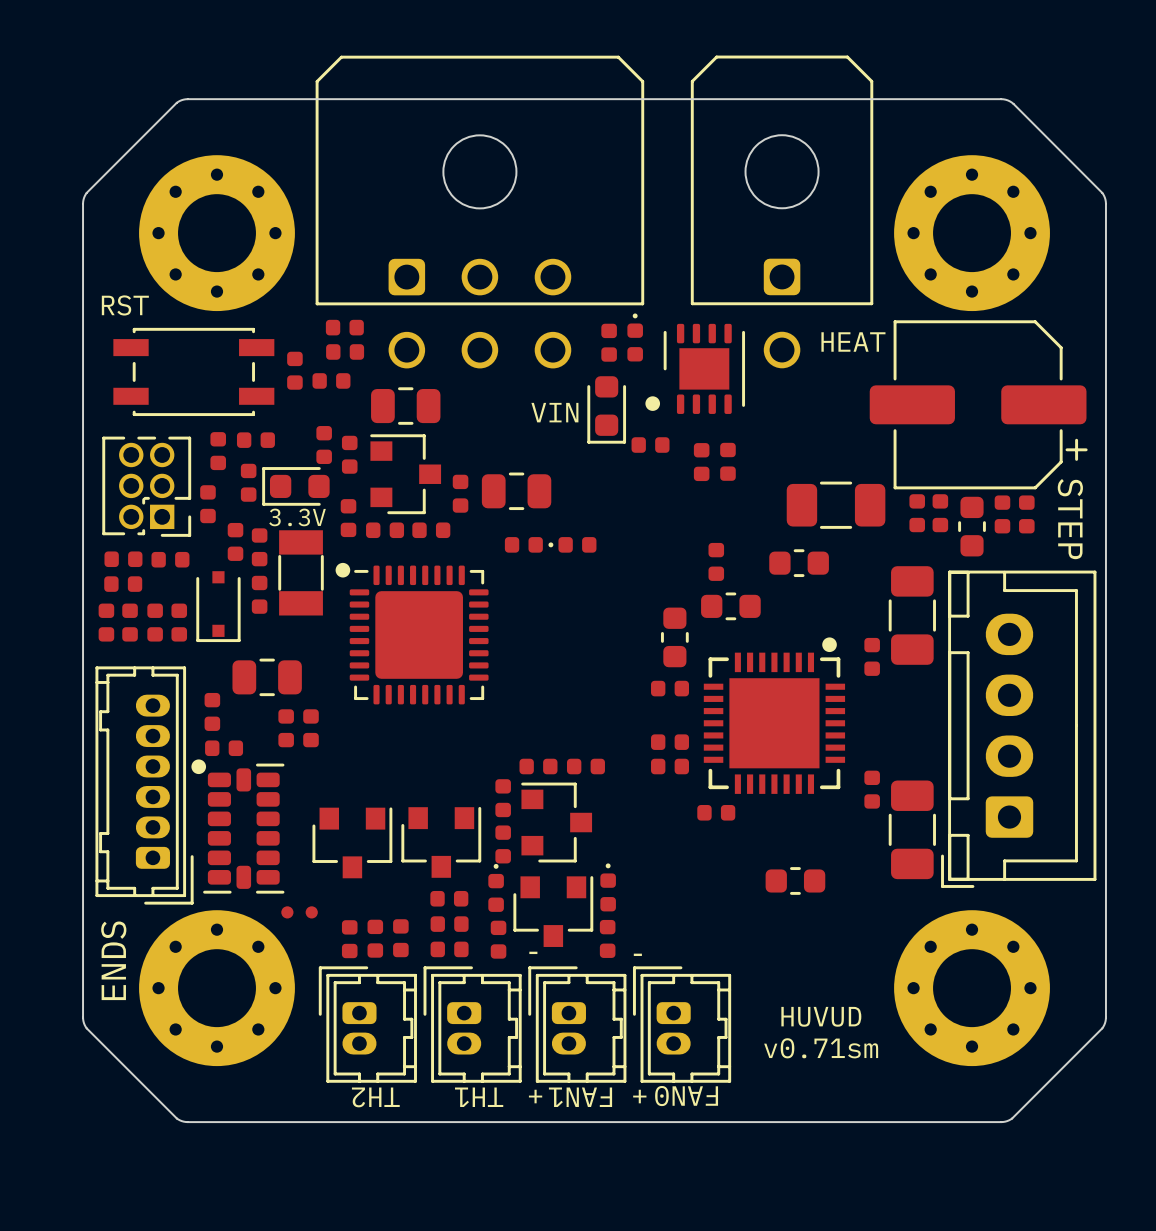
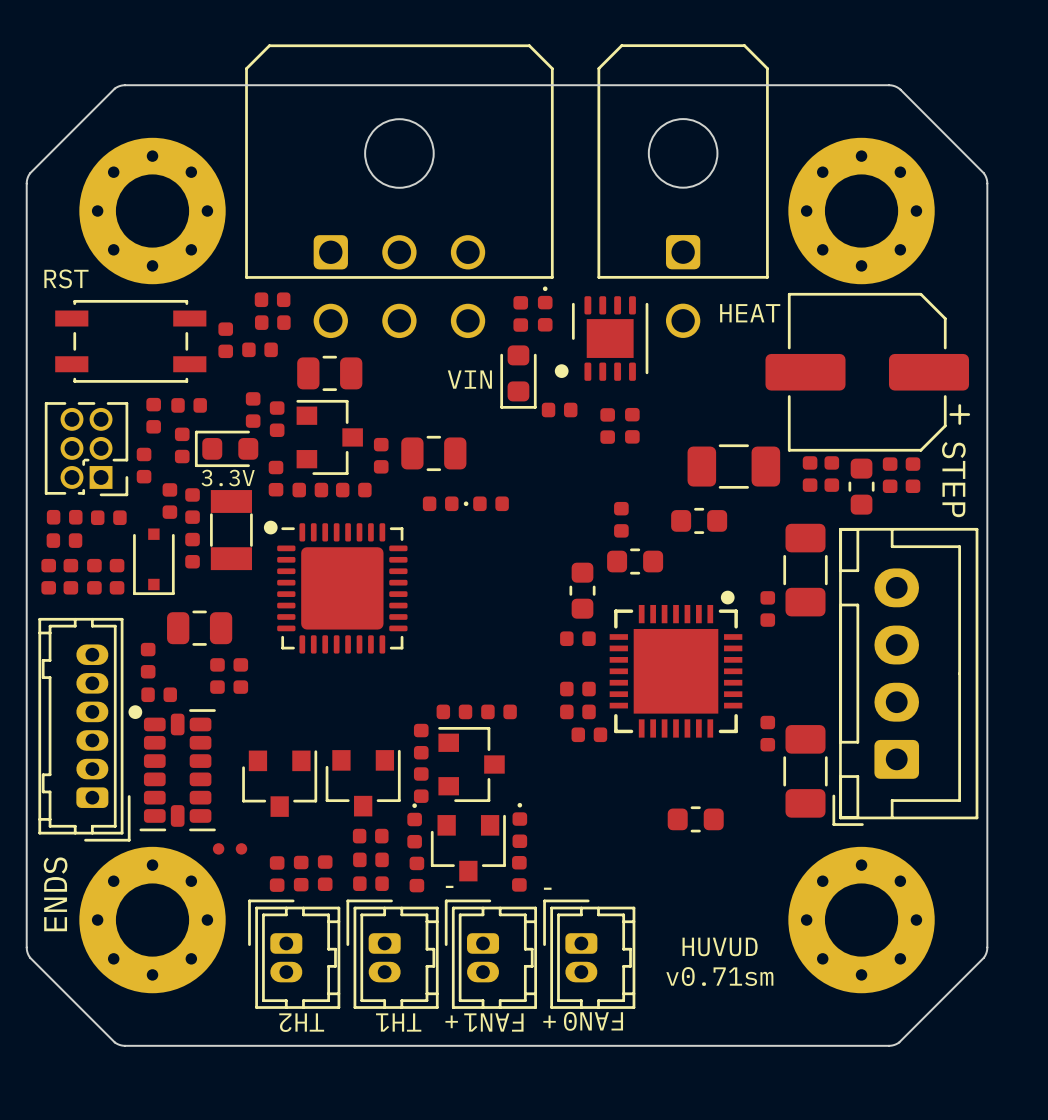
part position: (716, 812) -> (589, 734)

